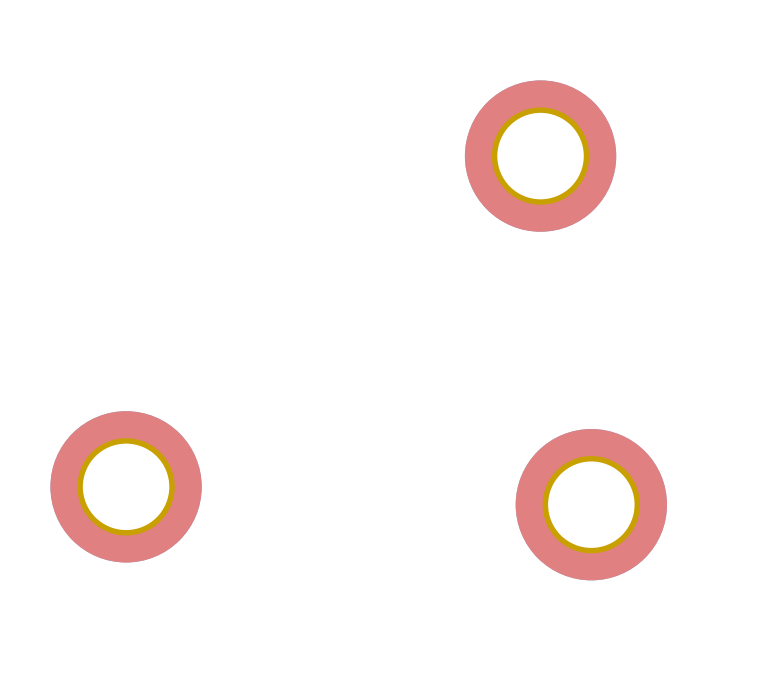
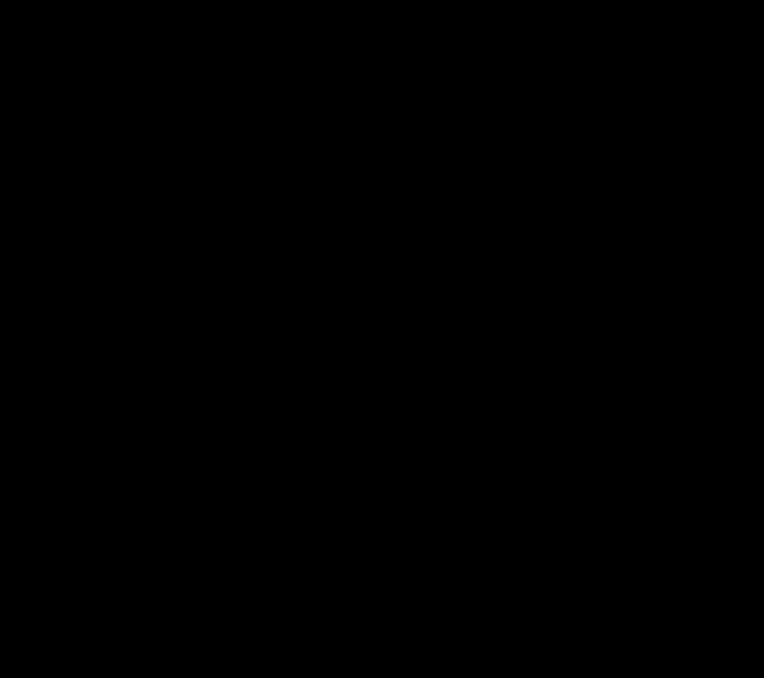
part: (540, 156) -> none
part: (126, 486) -> none
part: (591, 504) -> none

